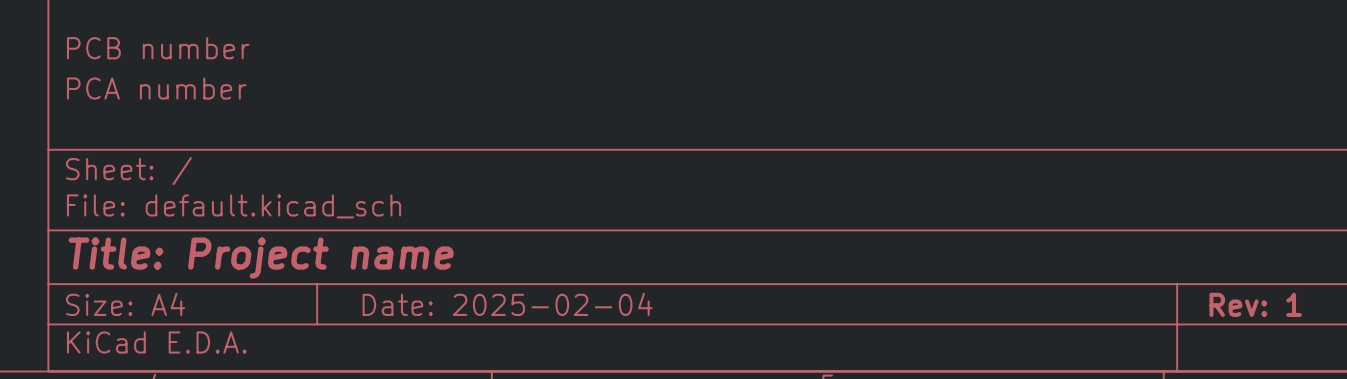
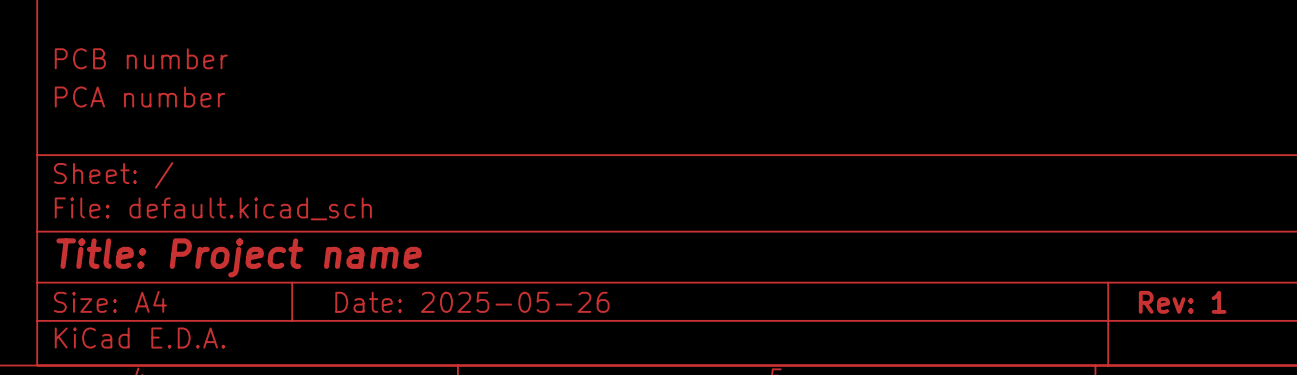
title block: Date: 2025-02-04 (507, 304) -> Date: 2025-05-26 (472, 302)

